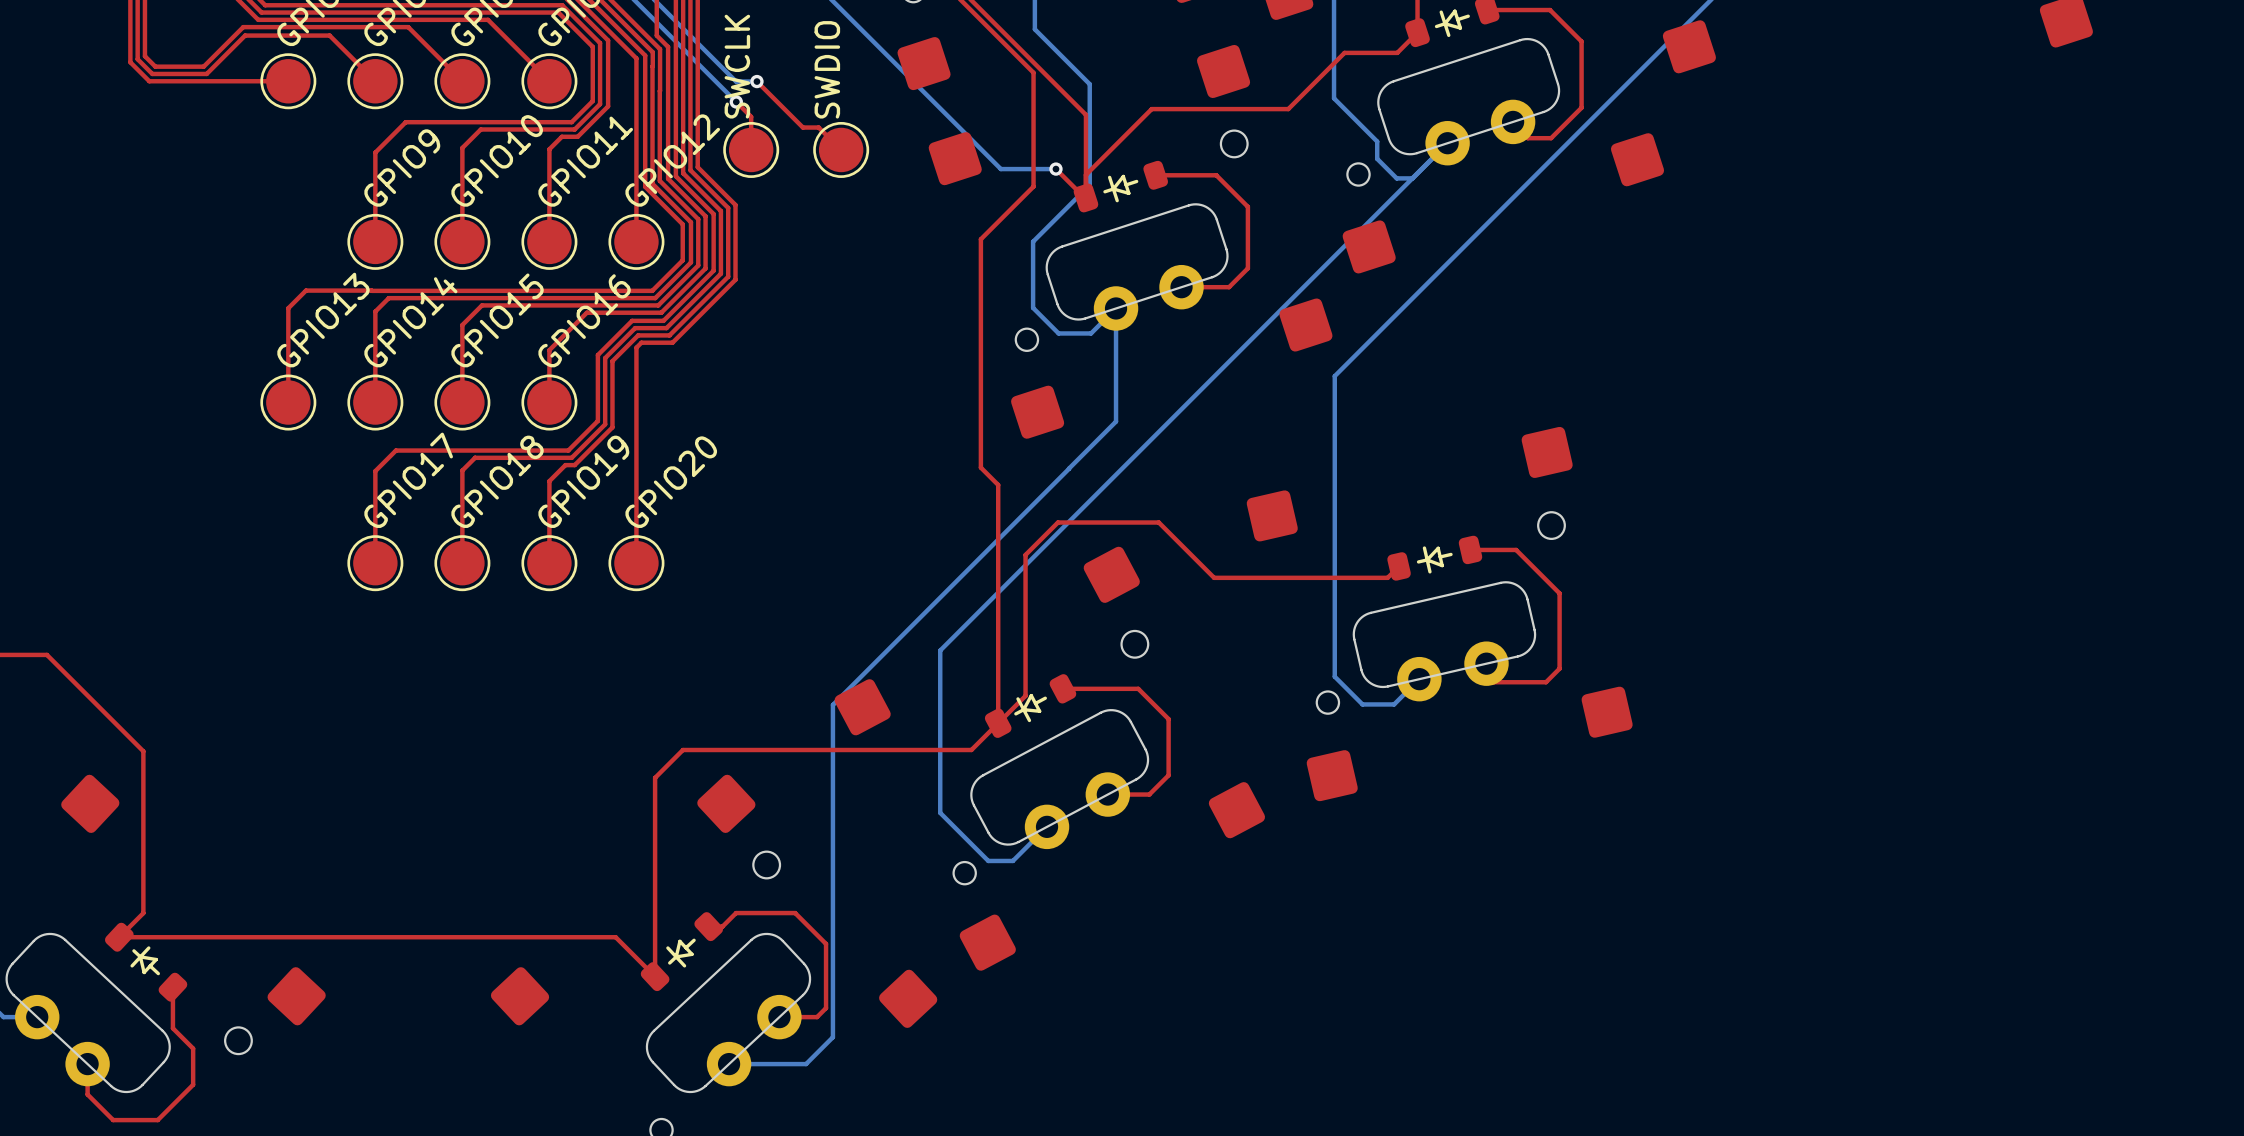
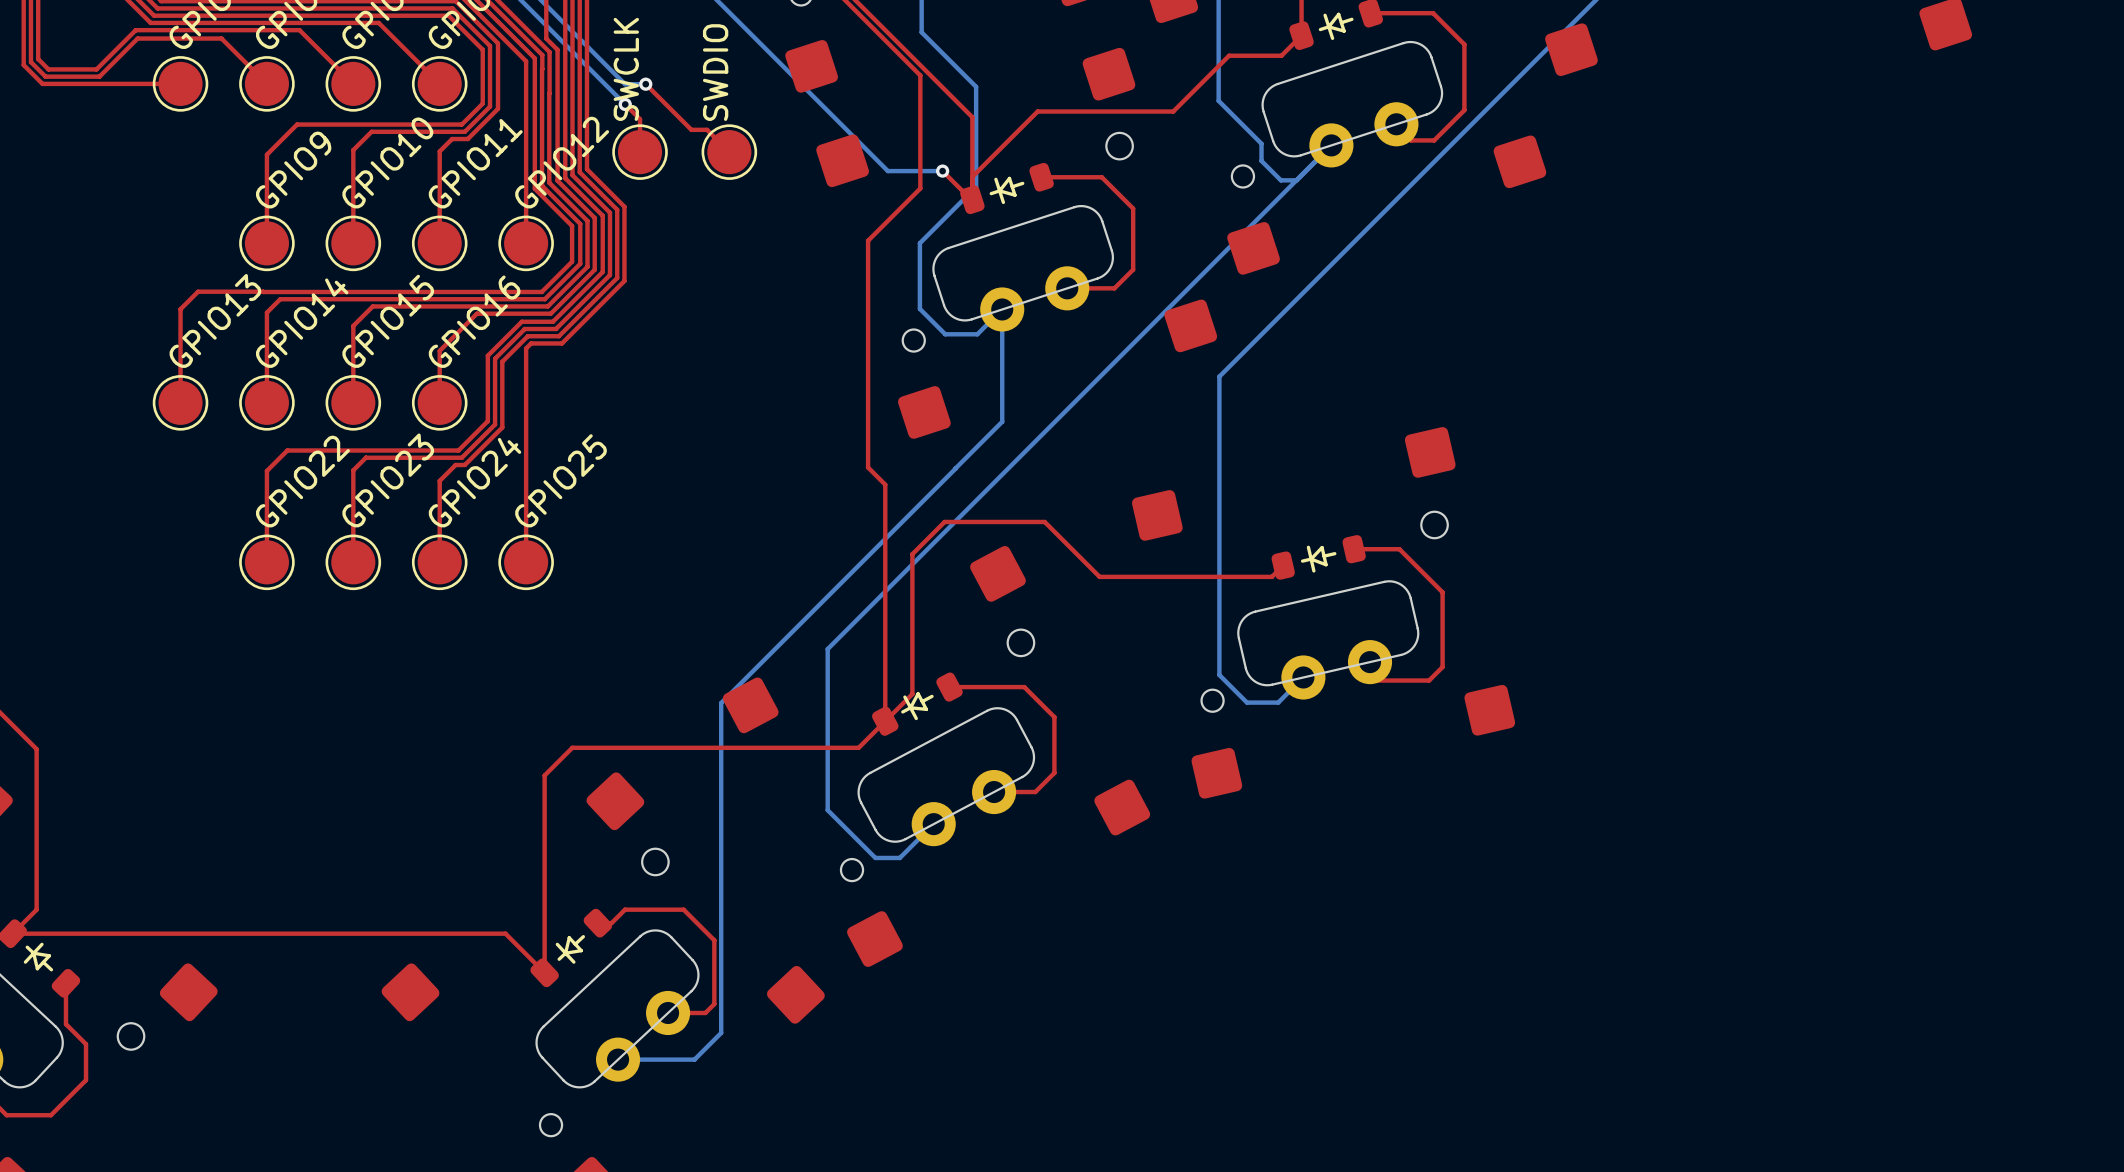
text: GPIO17 (408, 480) -> GPIO22 (302, 481)
text: GPIO18 (497, 481) -> GPIO23 (388, 480)
text: GPIO19 (583, 481) -> GPIO24 (475, 482)
text: GPIO20 (671, 482) -> GPIO25 (561, 480)

